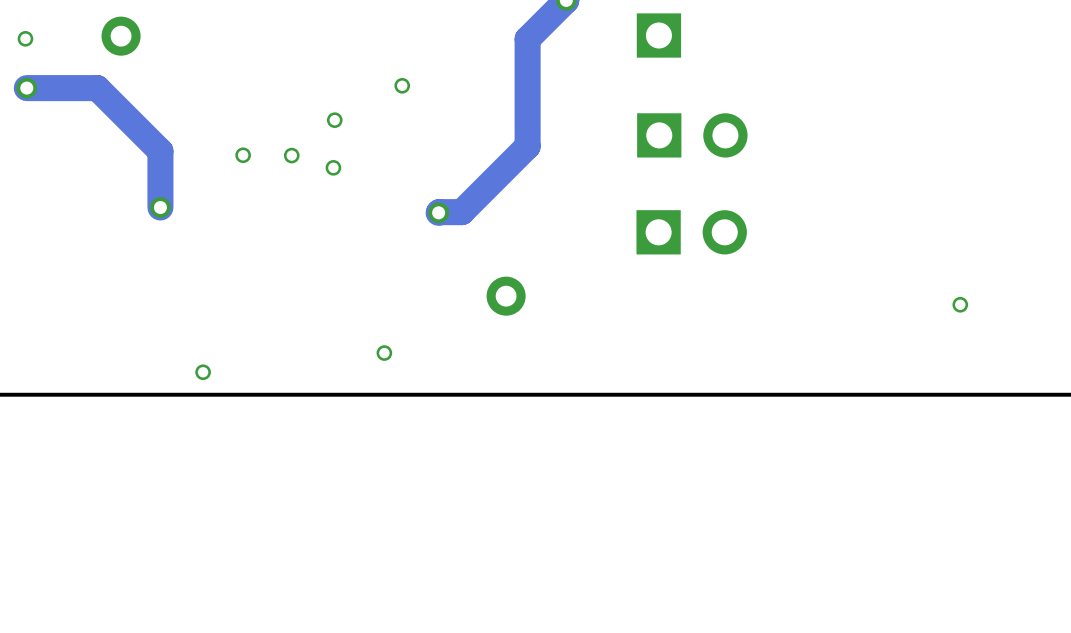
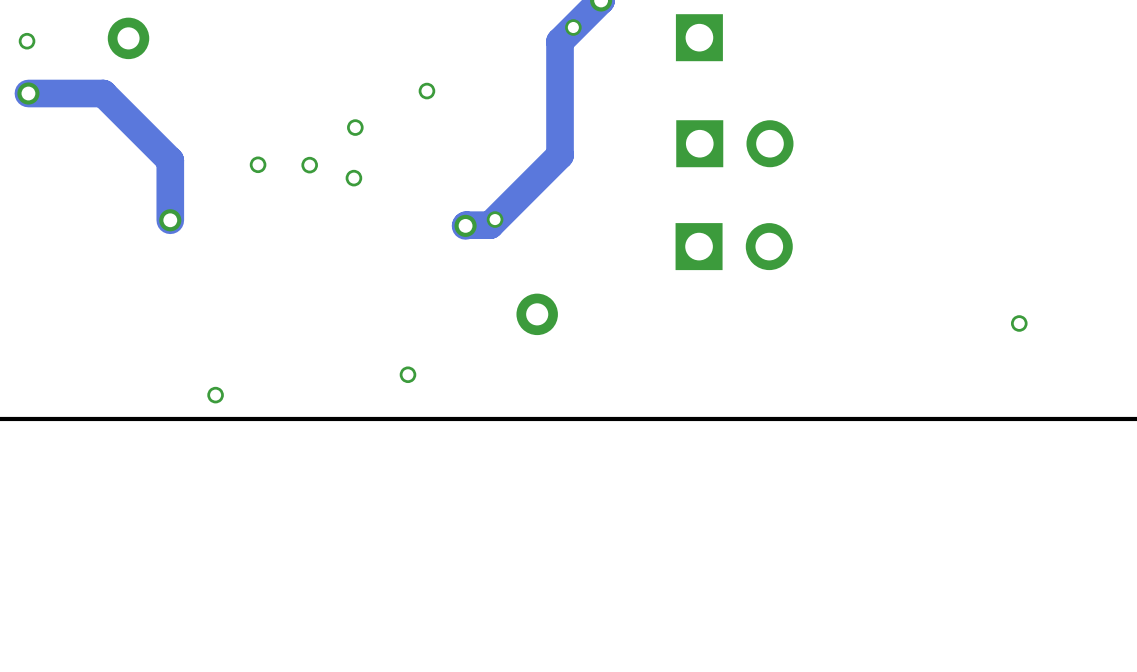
via: none -> (573, 27)
via: none -> (495, 219)

